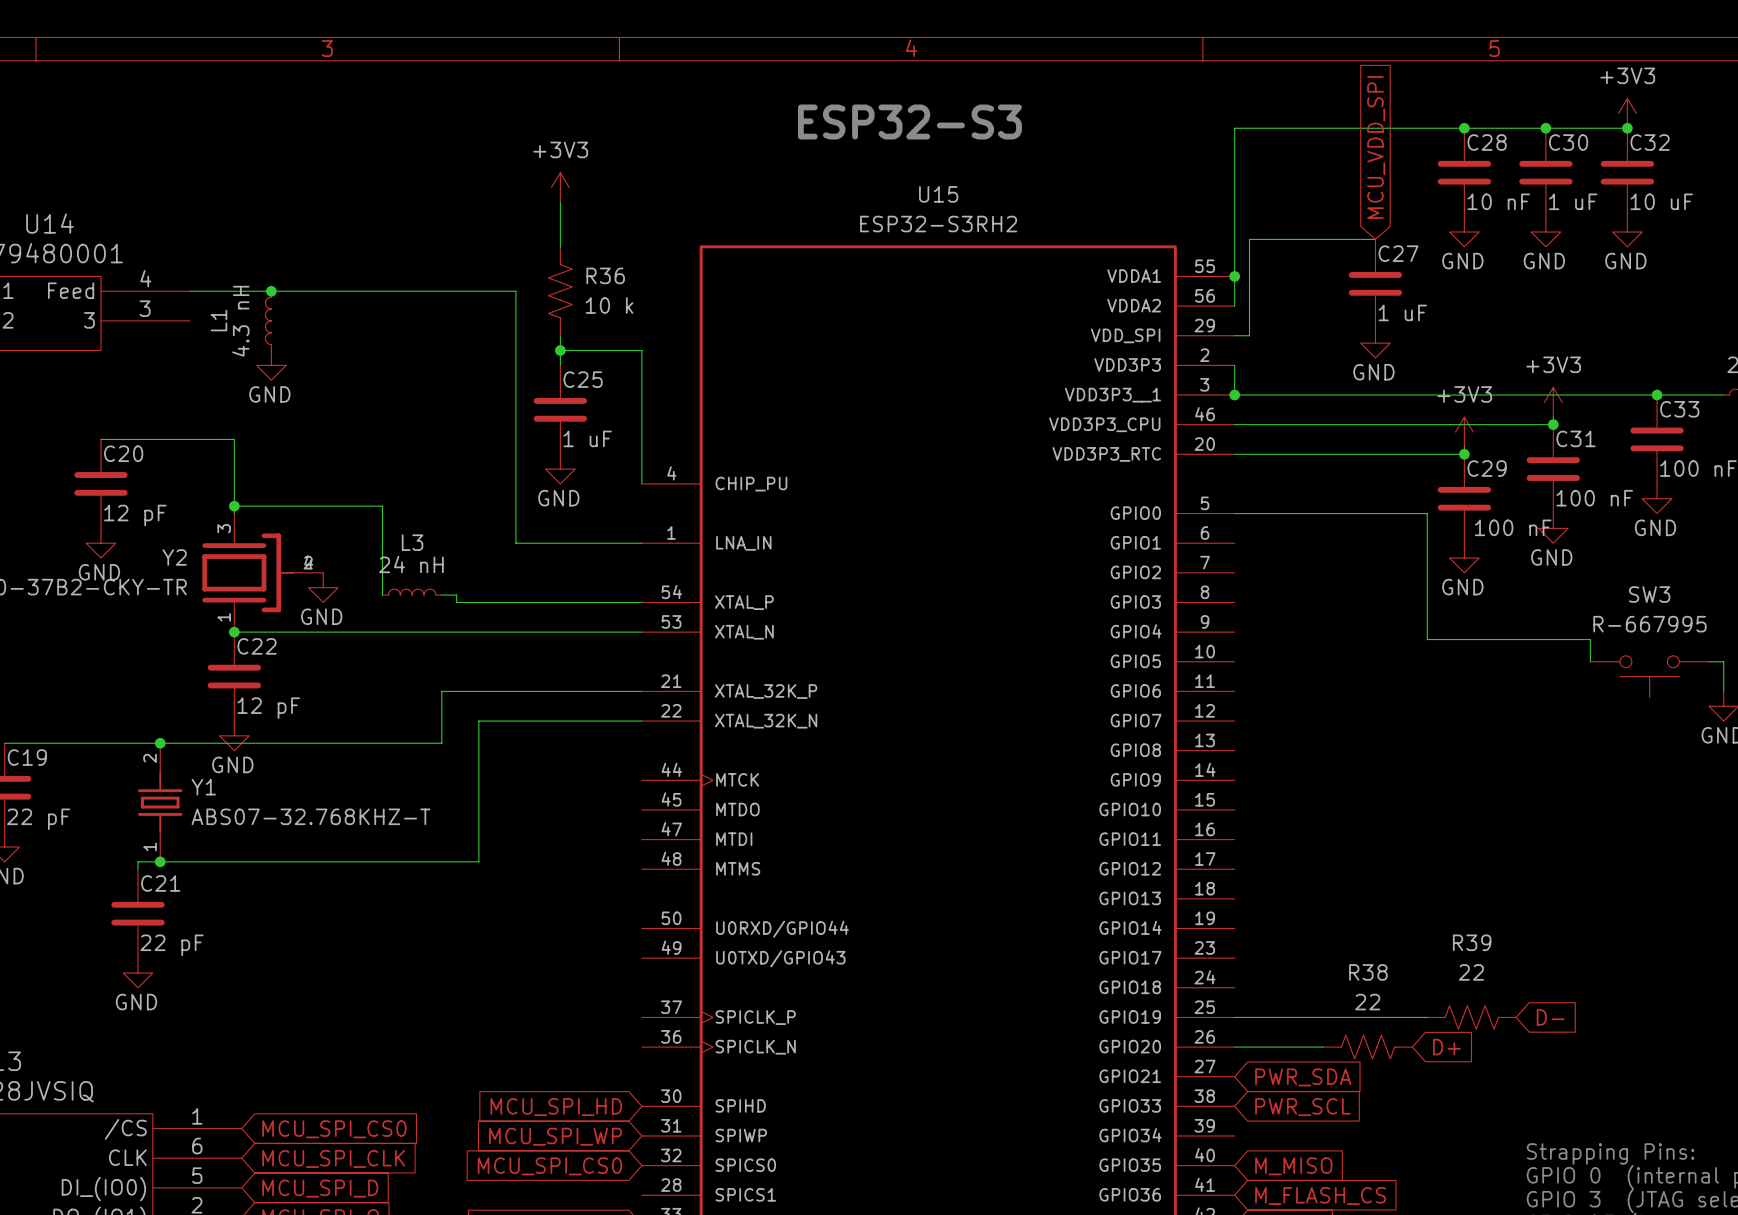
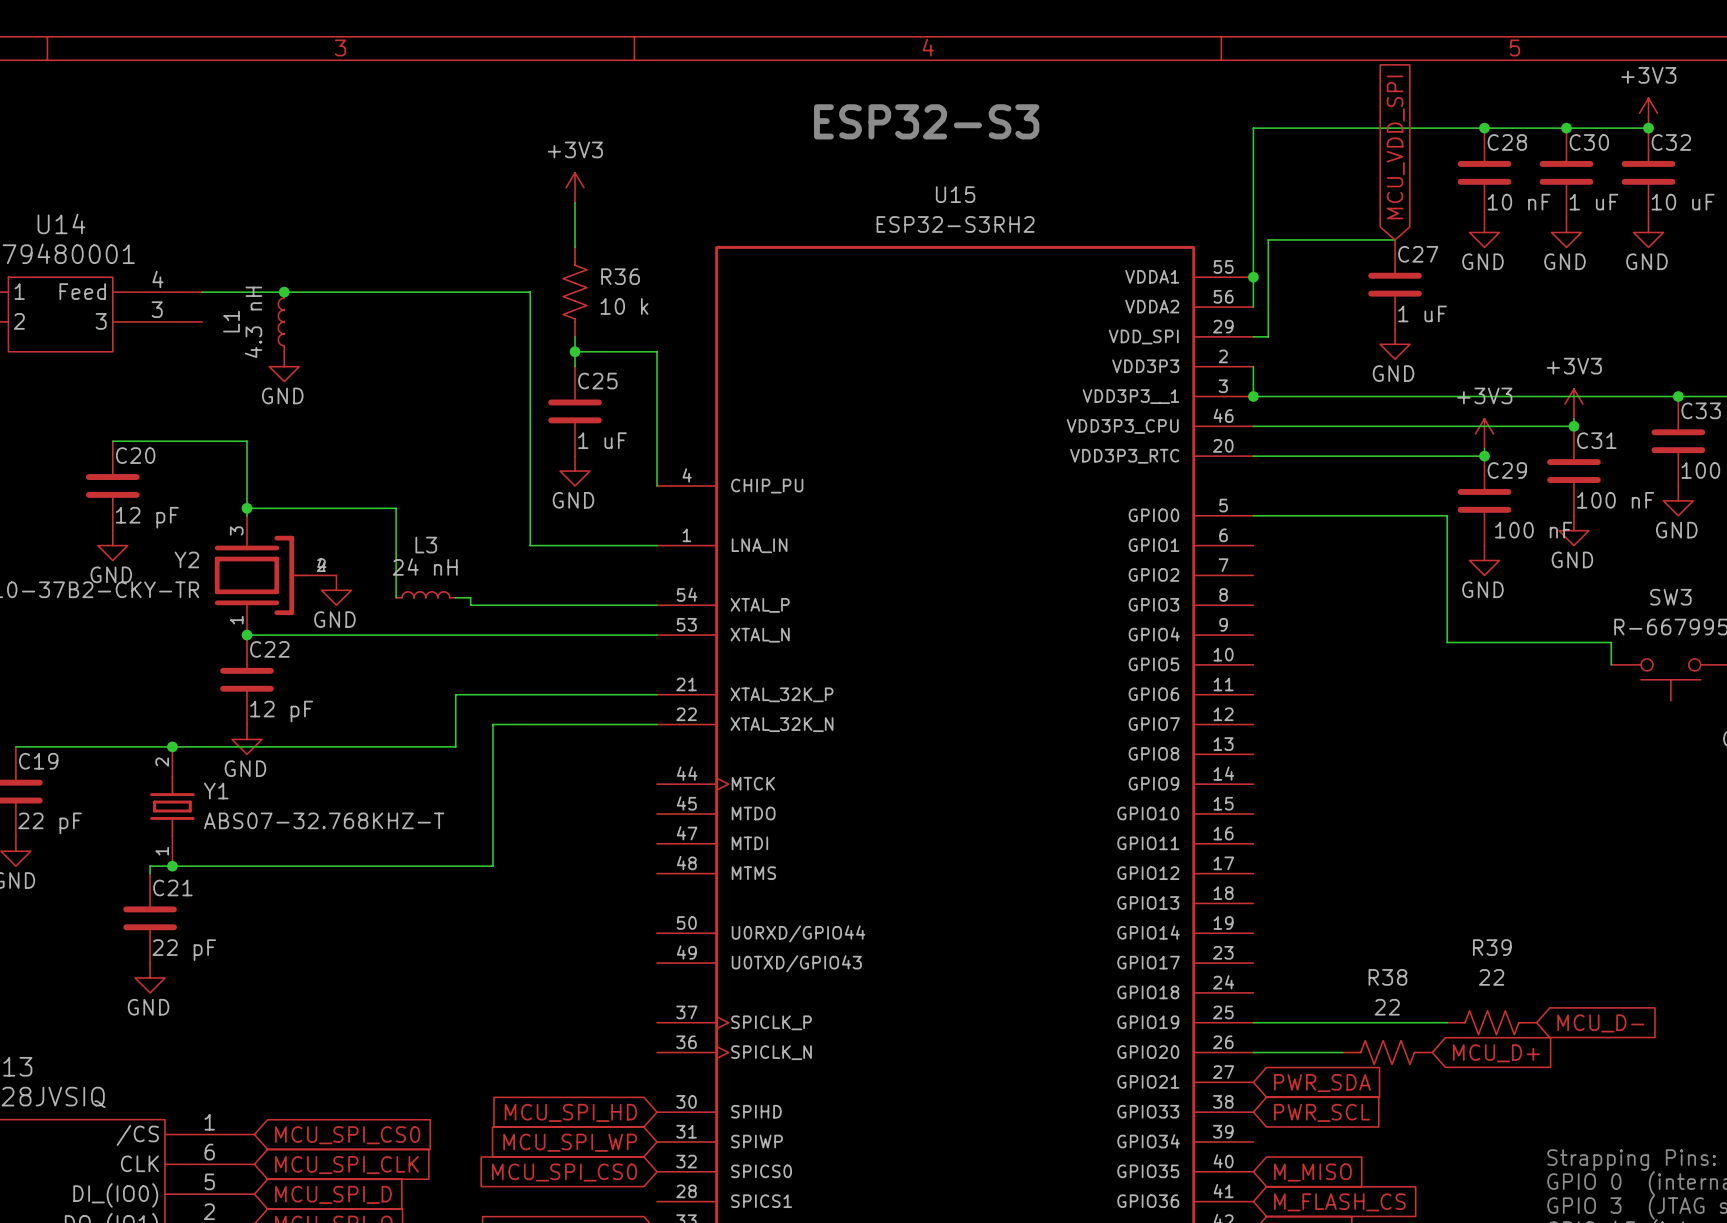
global label: D- (1550, 1017) -> MCU_D- (1600, 1023)
global label: D+ (1446, 1047) -> MCU_D+ (1496, 1053)

